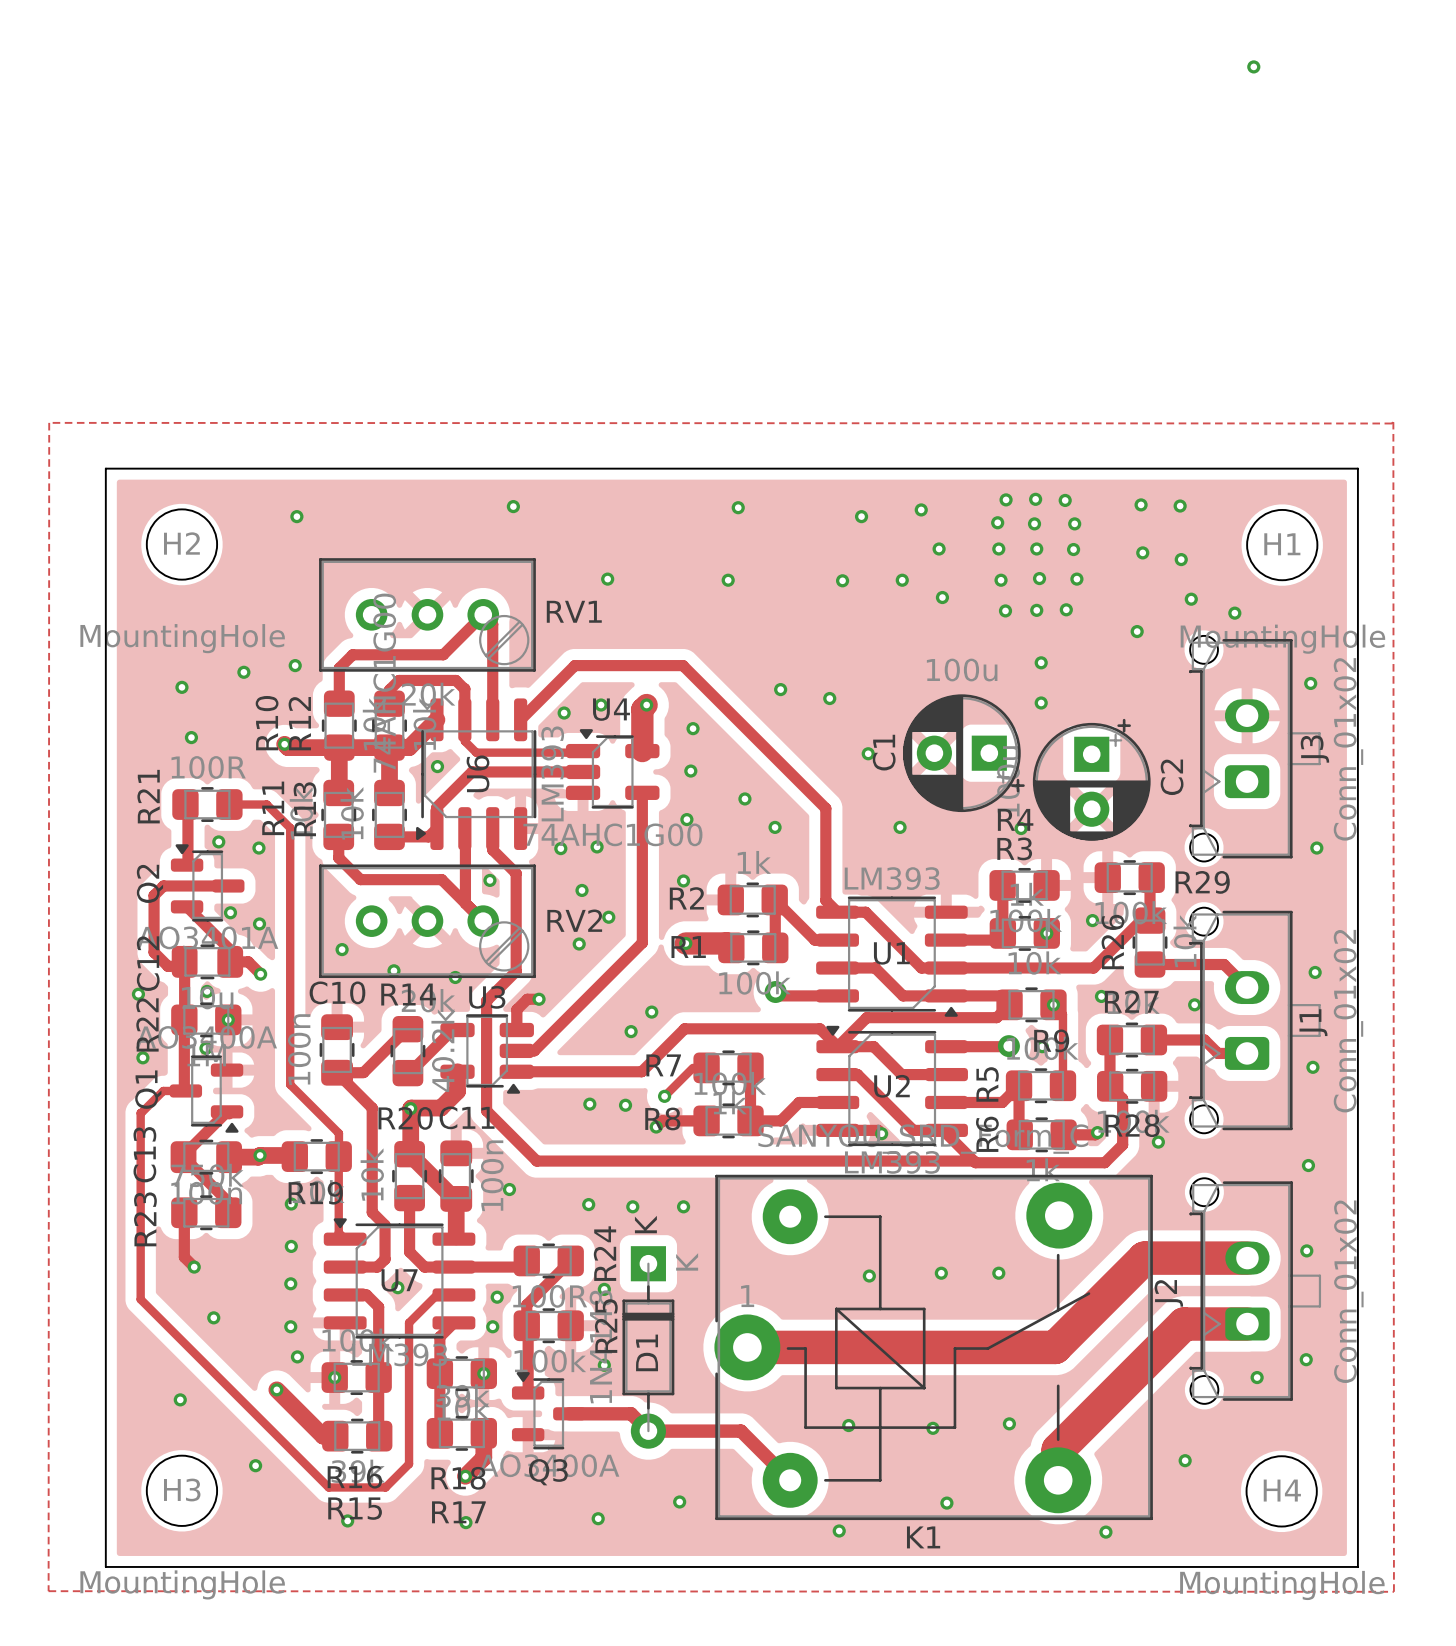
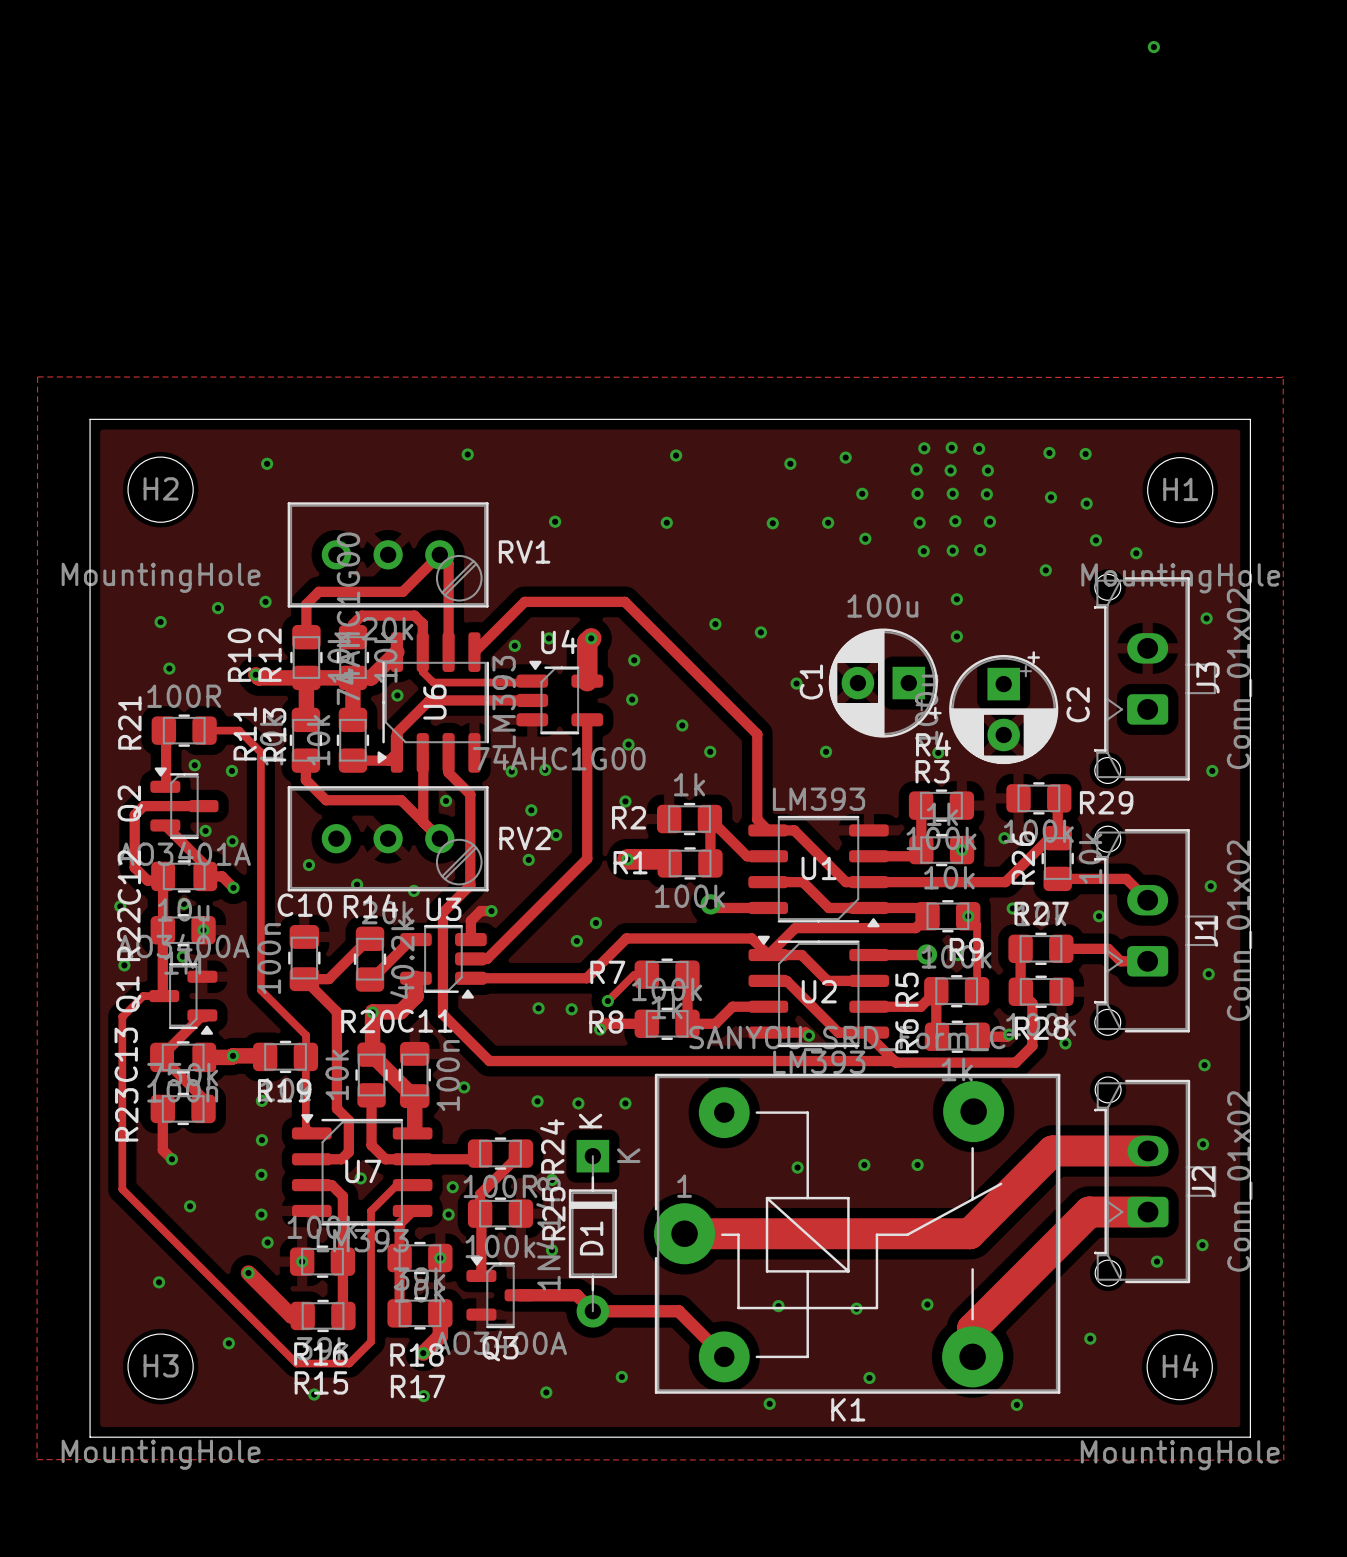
J2 name position: J2 (1168, 1293) -> J2 (1203, 1181)

